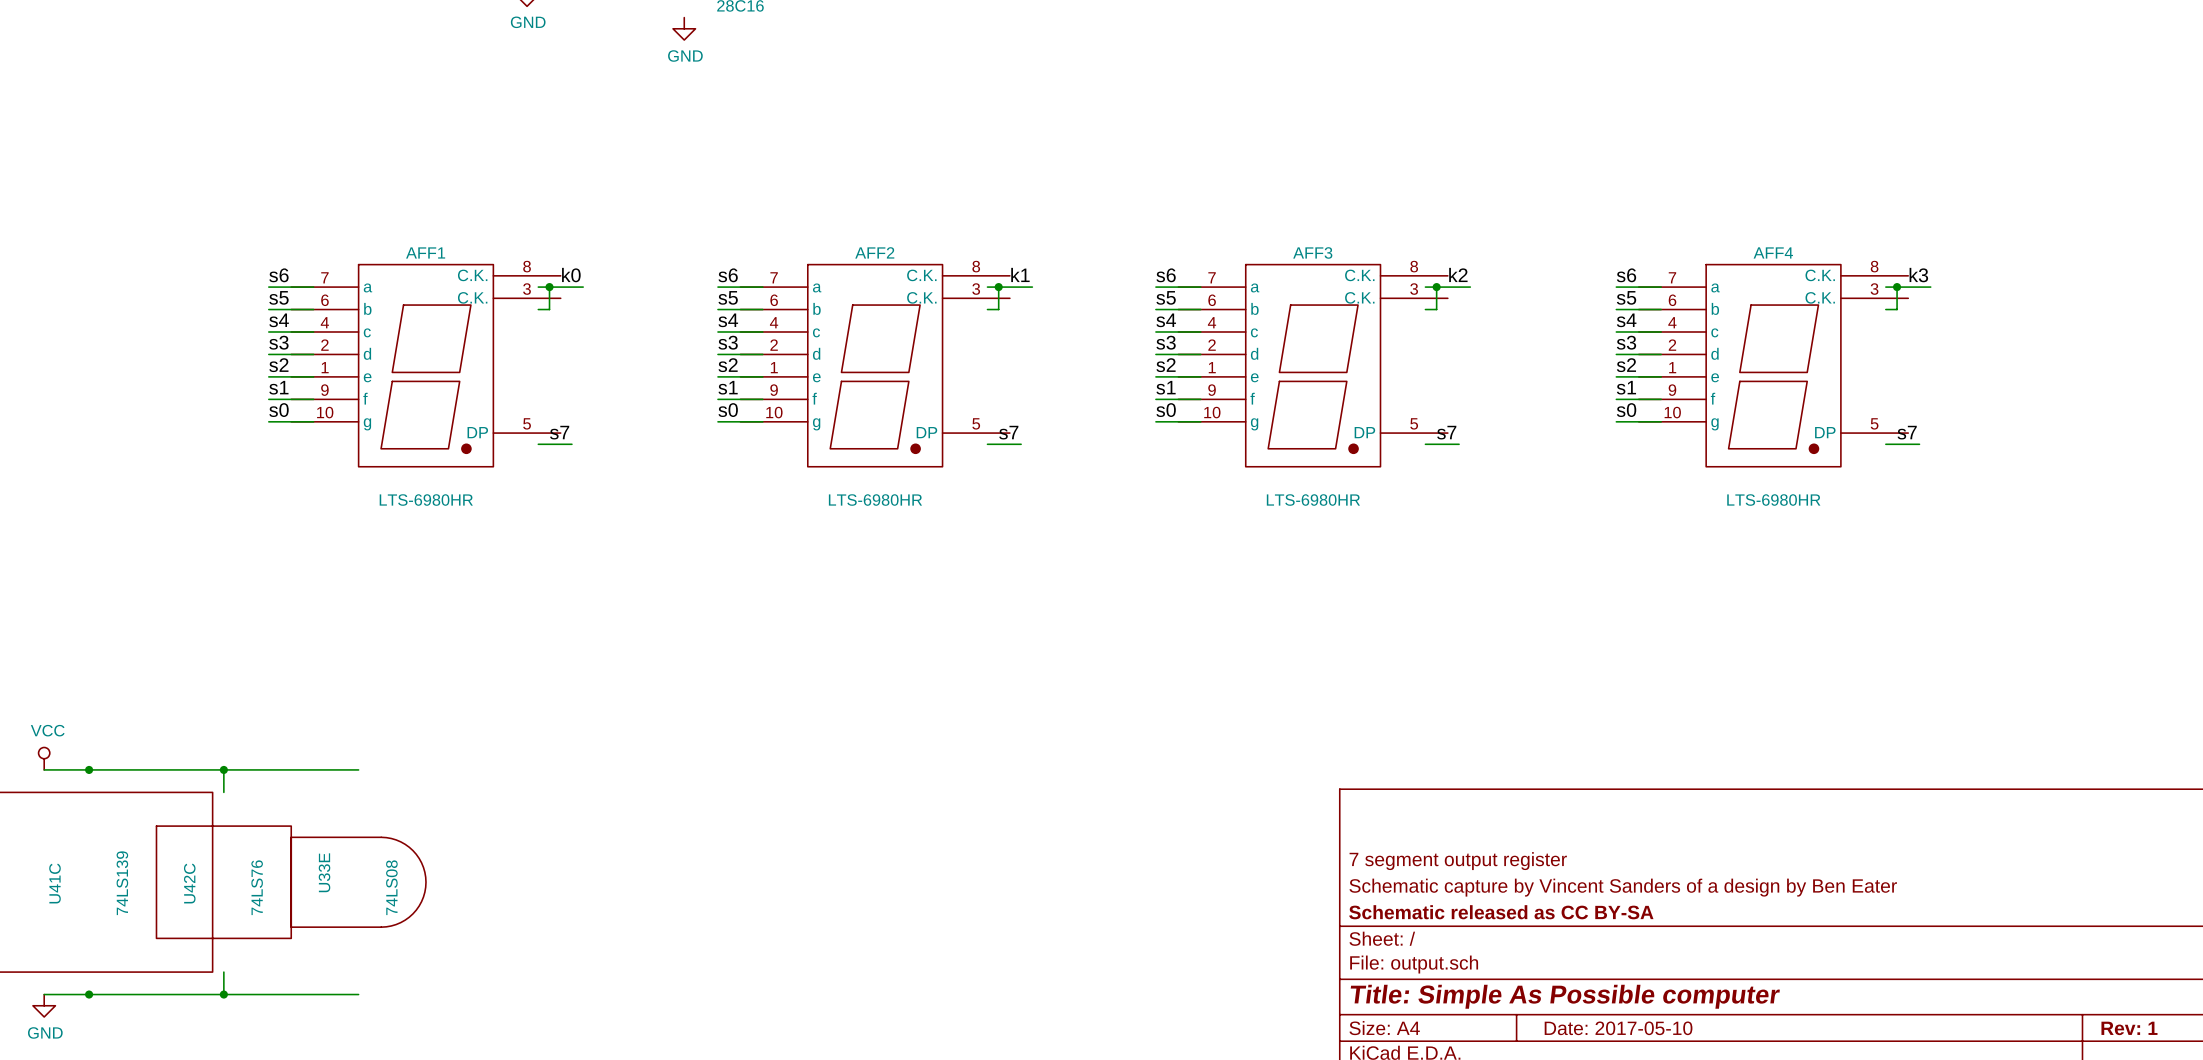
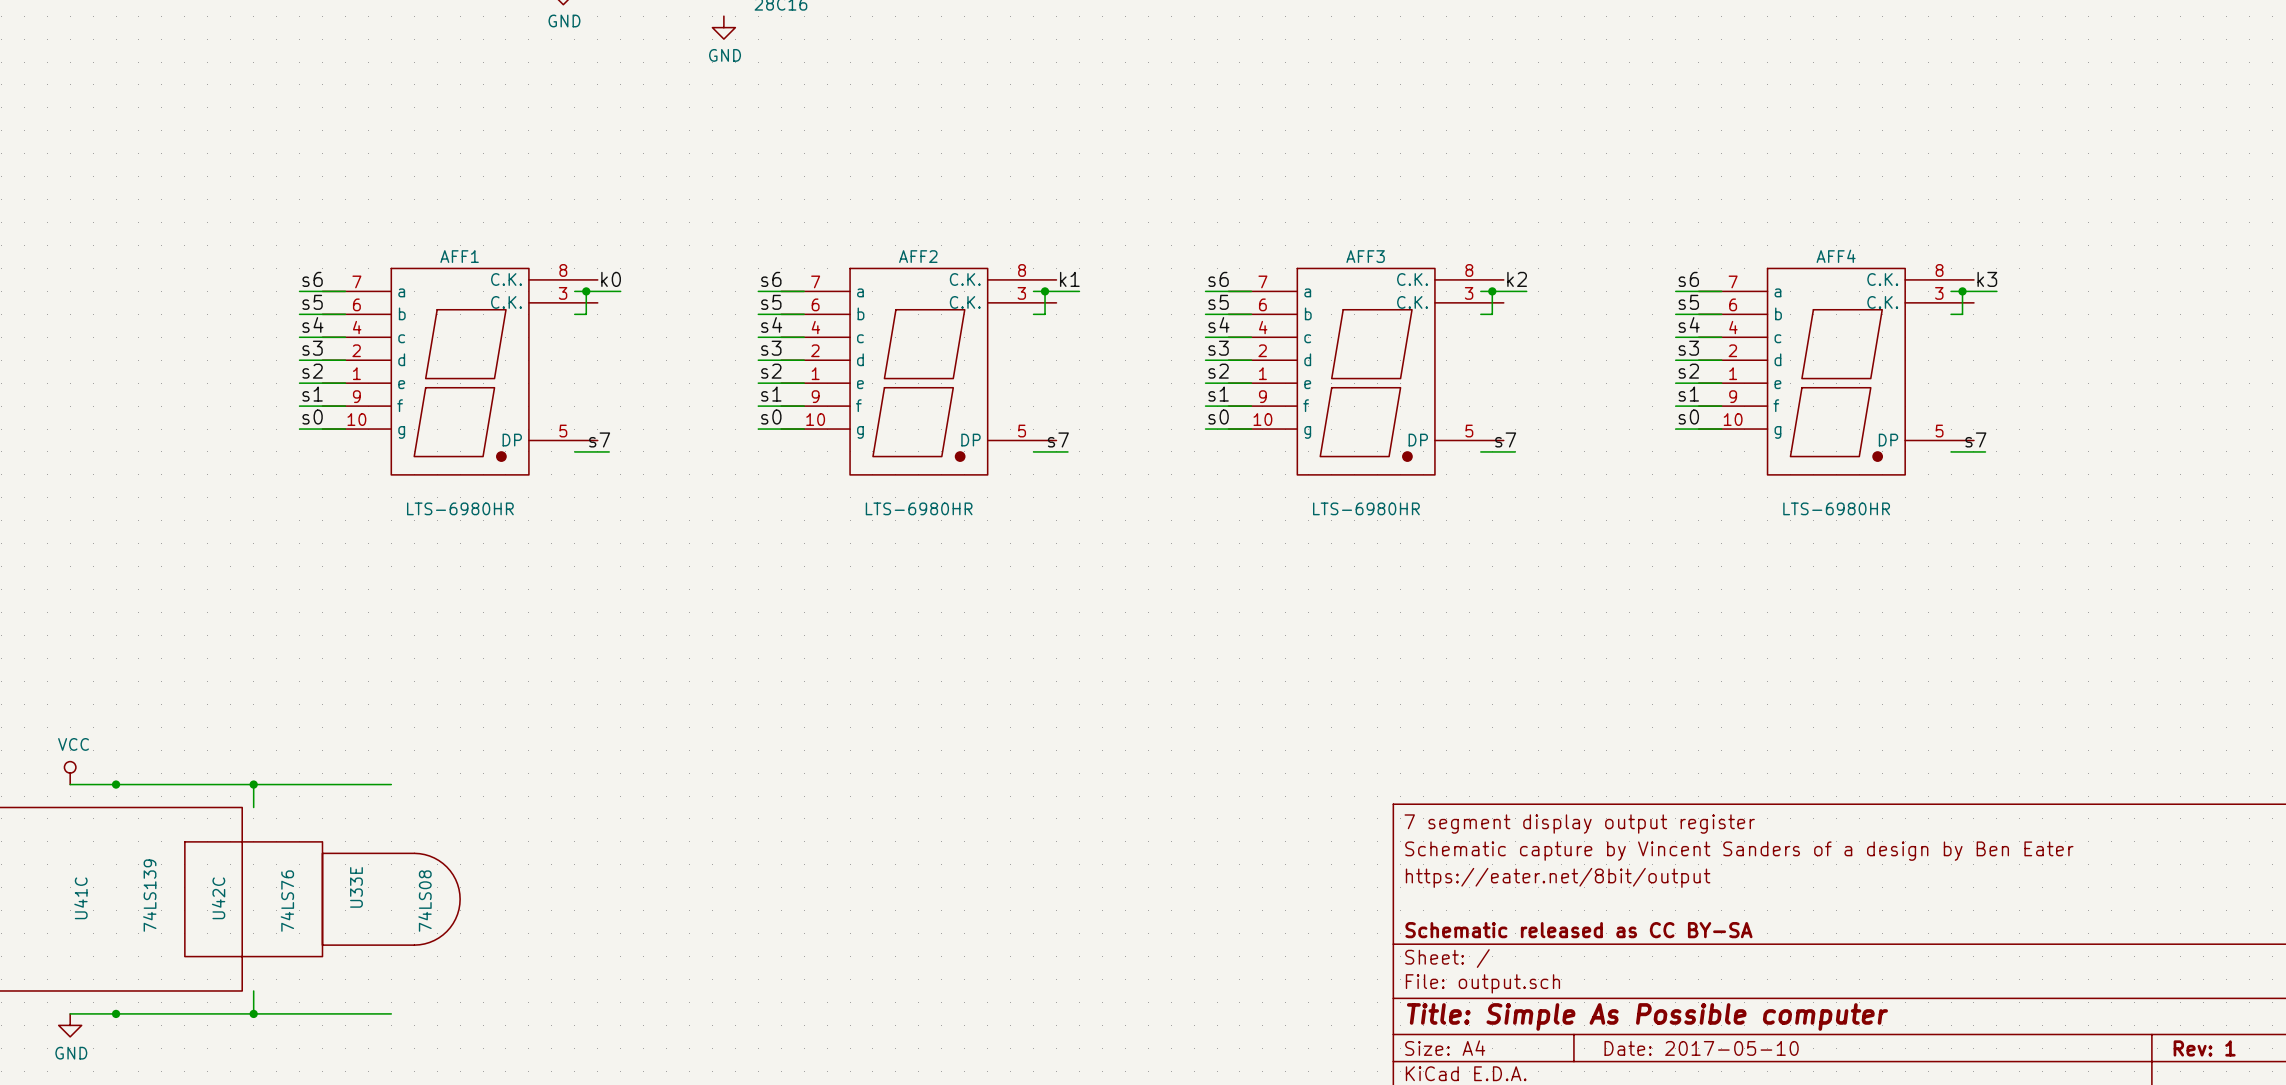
title block: none -> 7 segment display output register (1579, 824)
title block: 7 segment output register (1458, 861) -> https://eater.net/8bit/output (1558, 877)
title block position: Schematic capture by Vincent Sanders of a design by Ben Eater (1623, 887) -> Schematic capture by Vincent Sanders of a design by Ben Eater (1739, 851)

